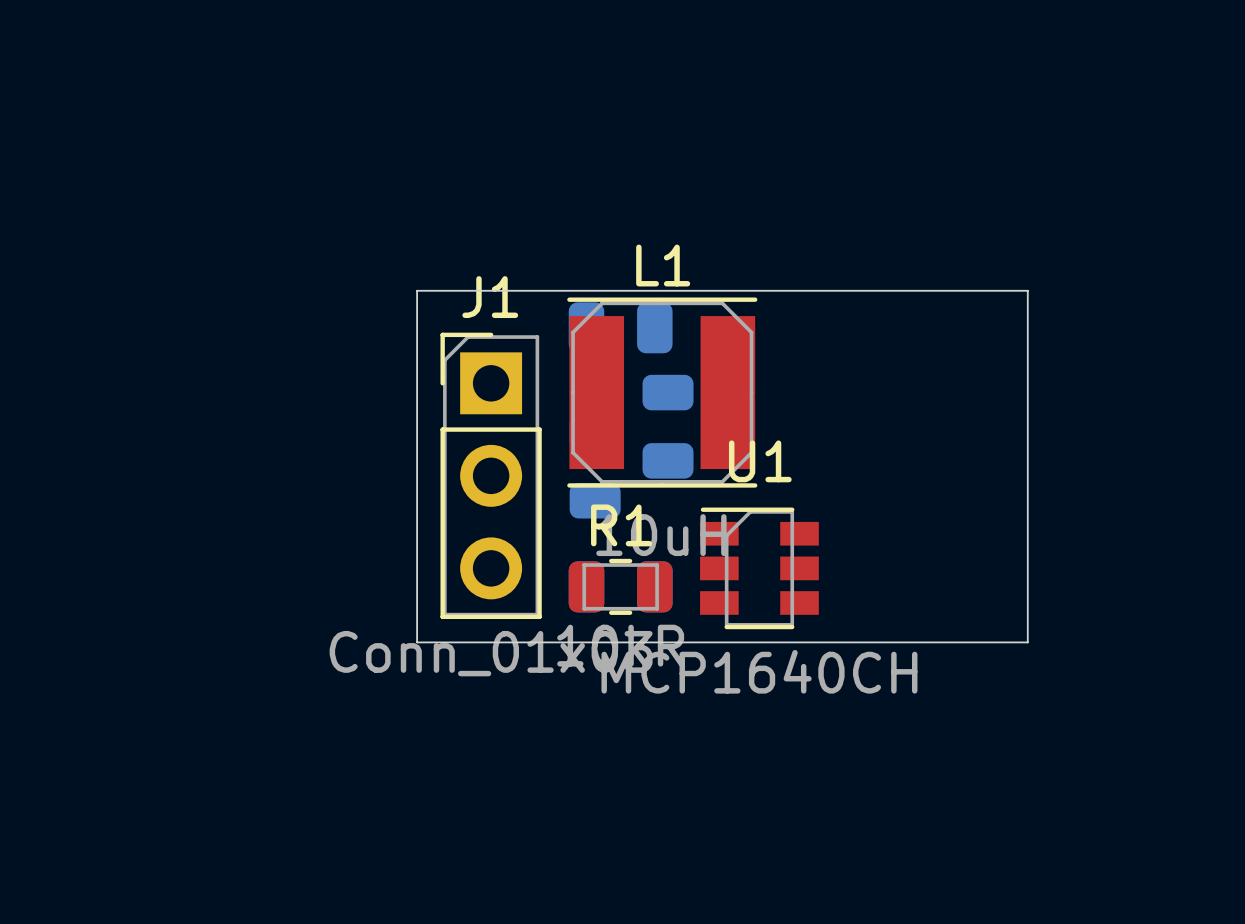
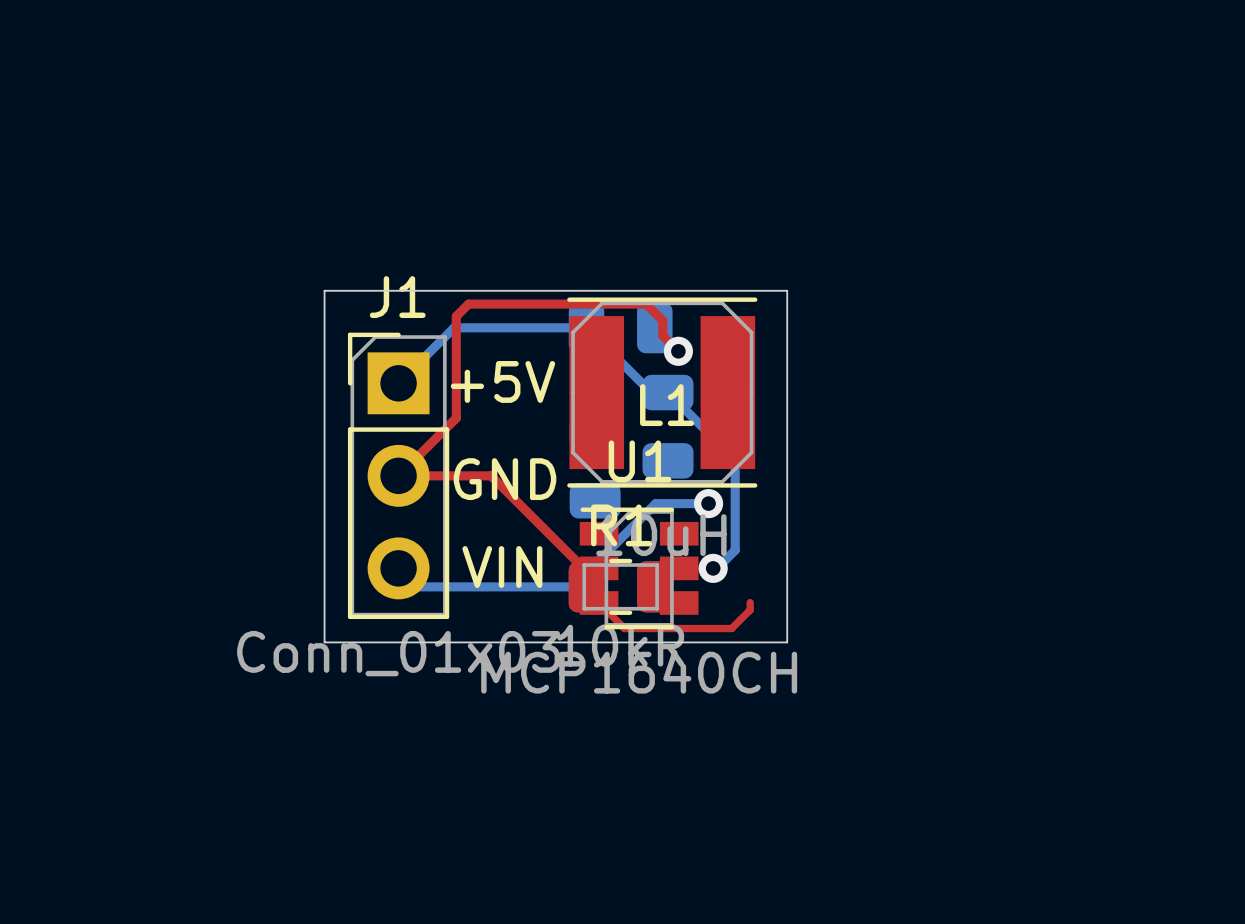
L1 name position: L1 (663, 265) -> L1 (667, 405)
board edge: (417, 290) (417, 642) -> (417, 290) (324, 290) (324, 642) (417, 642)
board edge: (787, 290) (1027, 290) (1027, 642) (787, 642) -> (787, 290) (787, 642)
top track: none -> (678, 351) (662, 335) (662, 320) (646, 304) (468, 304) (456, 316) (456, 418) (398, 475)
via: none -> (678, 351)
text: none -> +5V (502, 381)
bottom track: none -> (398, 383) (454, 327) (586, 327) (651, 392) (668, 392) (735, 459) (735, 550) (717, 568) (713, 568)
top track: none -> (398, 475) (491, 475) (583, 568) (599, 568)
J1 position: (491, 475) -> (398, 475)
text: none -> GND (504, 479)
bottom track: none -> (708, 503) (655, 503) (586, 572) (586, 586)
via: none -> (708, 503)
text: none -> VIN (502, 567)
bottom track: none -> (398, 568) (417, 586) (586, 586)
via: none -> (713, 568)
U1 position: (759, 568) -> (639, 568)
top track: none -> (750, 602) (750, 610) (731, 628) (624, 628) (599, 602)

